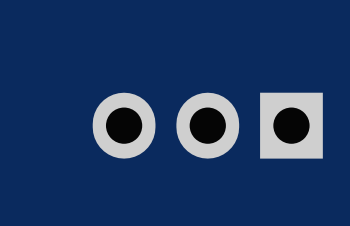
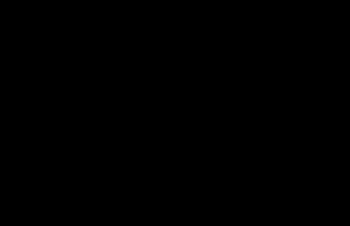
part: (207, 125) -> none

